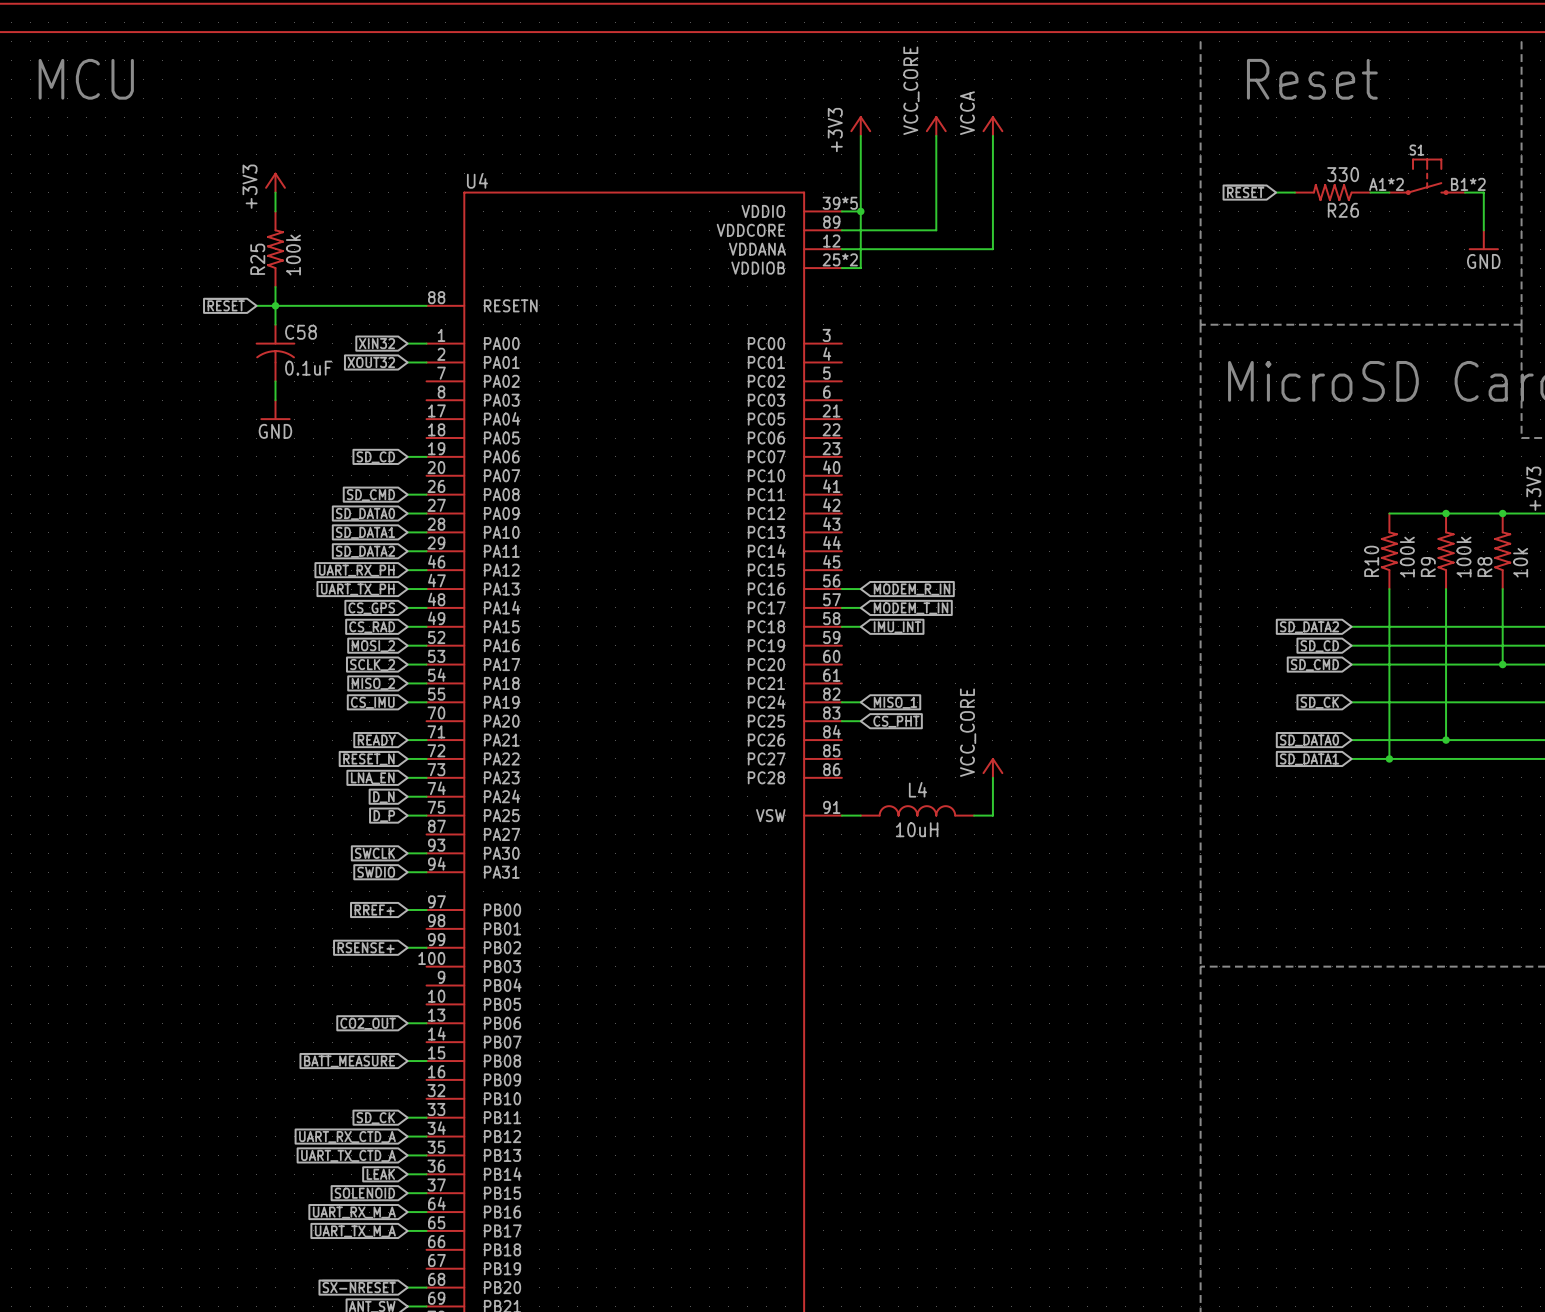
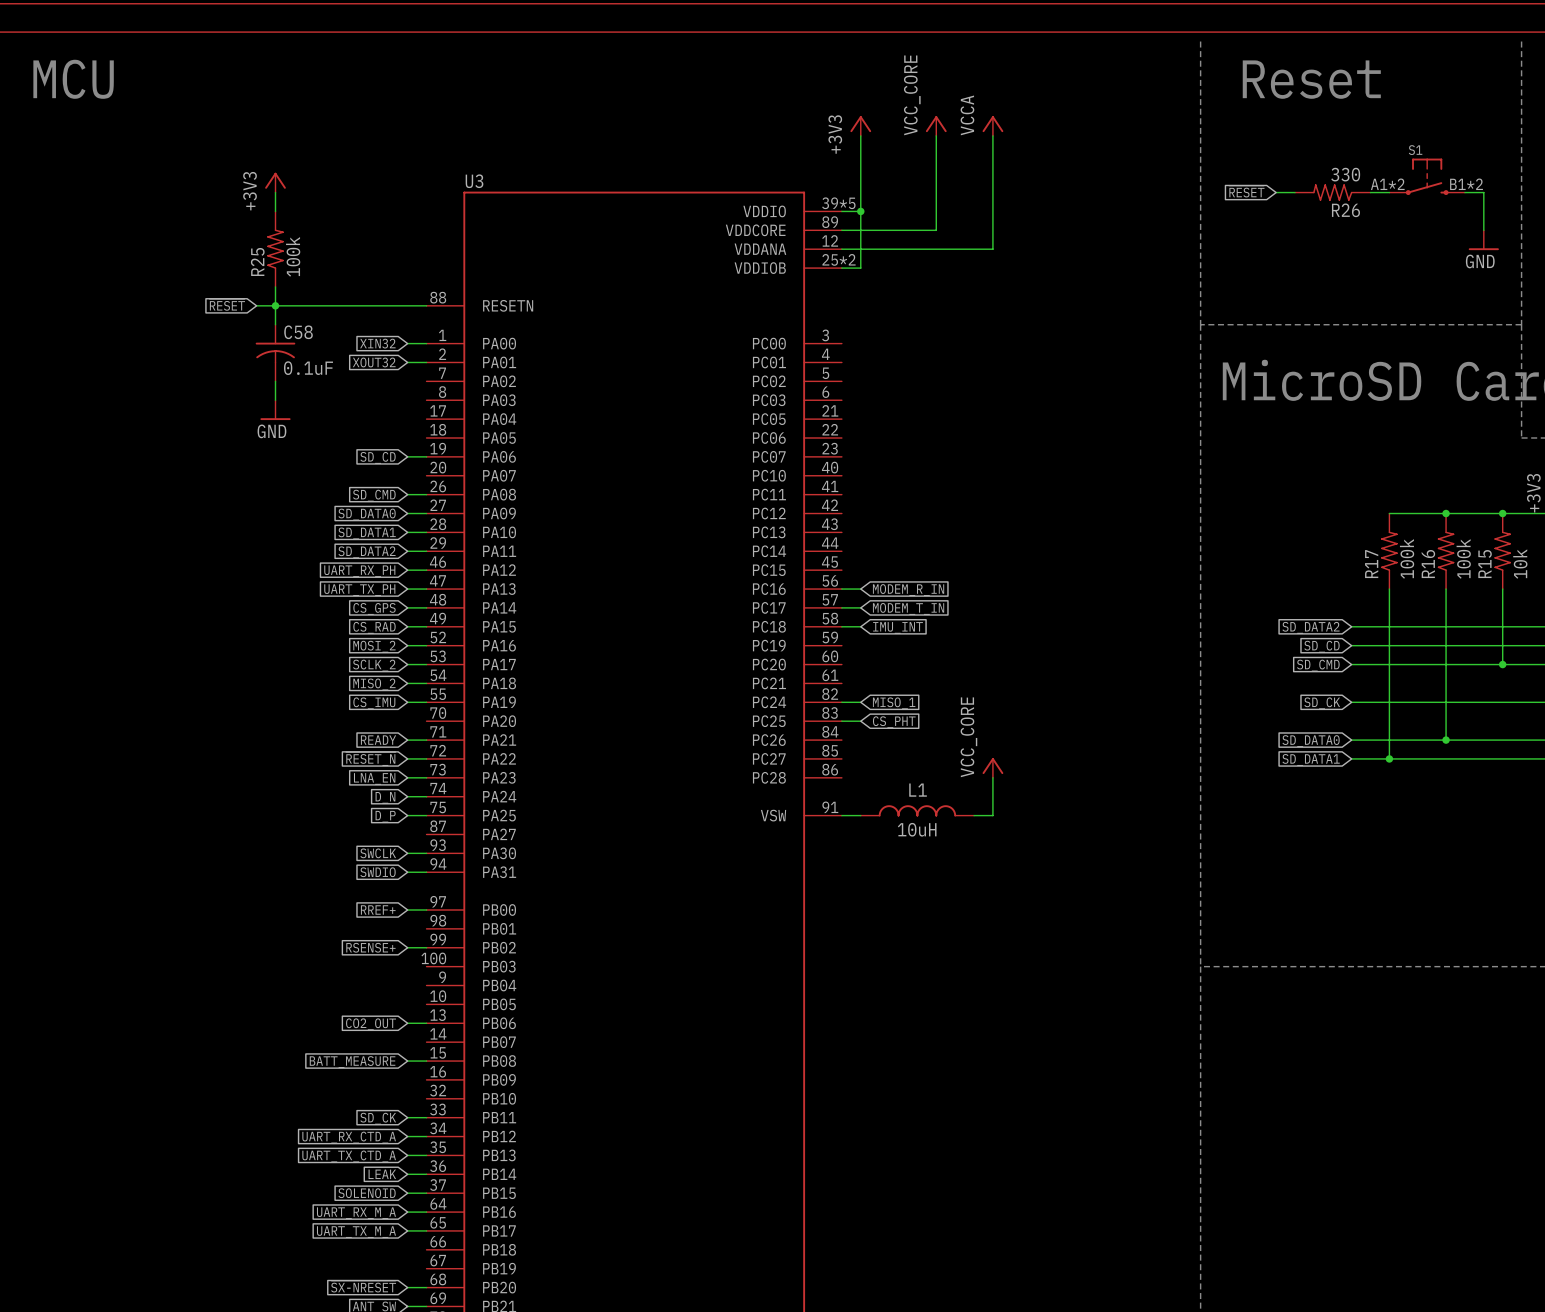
U4 name: U4 (477, 180) -> U3 (474, 181)
R10 name: R10 (1371, 561) -> R17 (1371, 564)
R9 name: R9 (1428, 567) -> R16 (1428, 564)
R8 name: R8 (1484, 567) -> R15 (1485, 564)
L4 name: L4 (917, 789) -> L1 (918, 790)

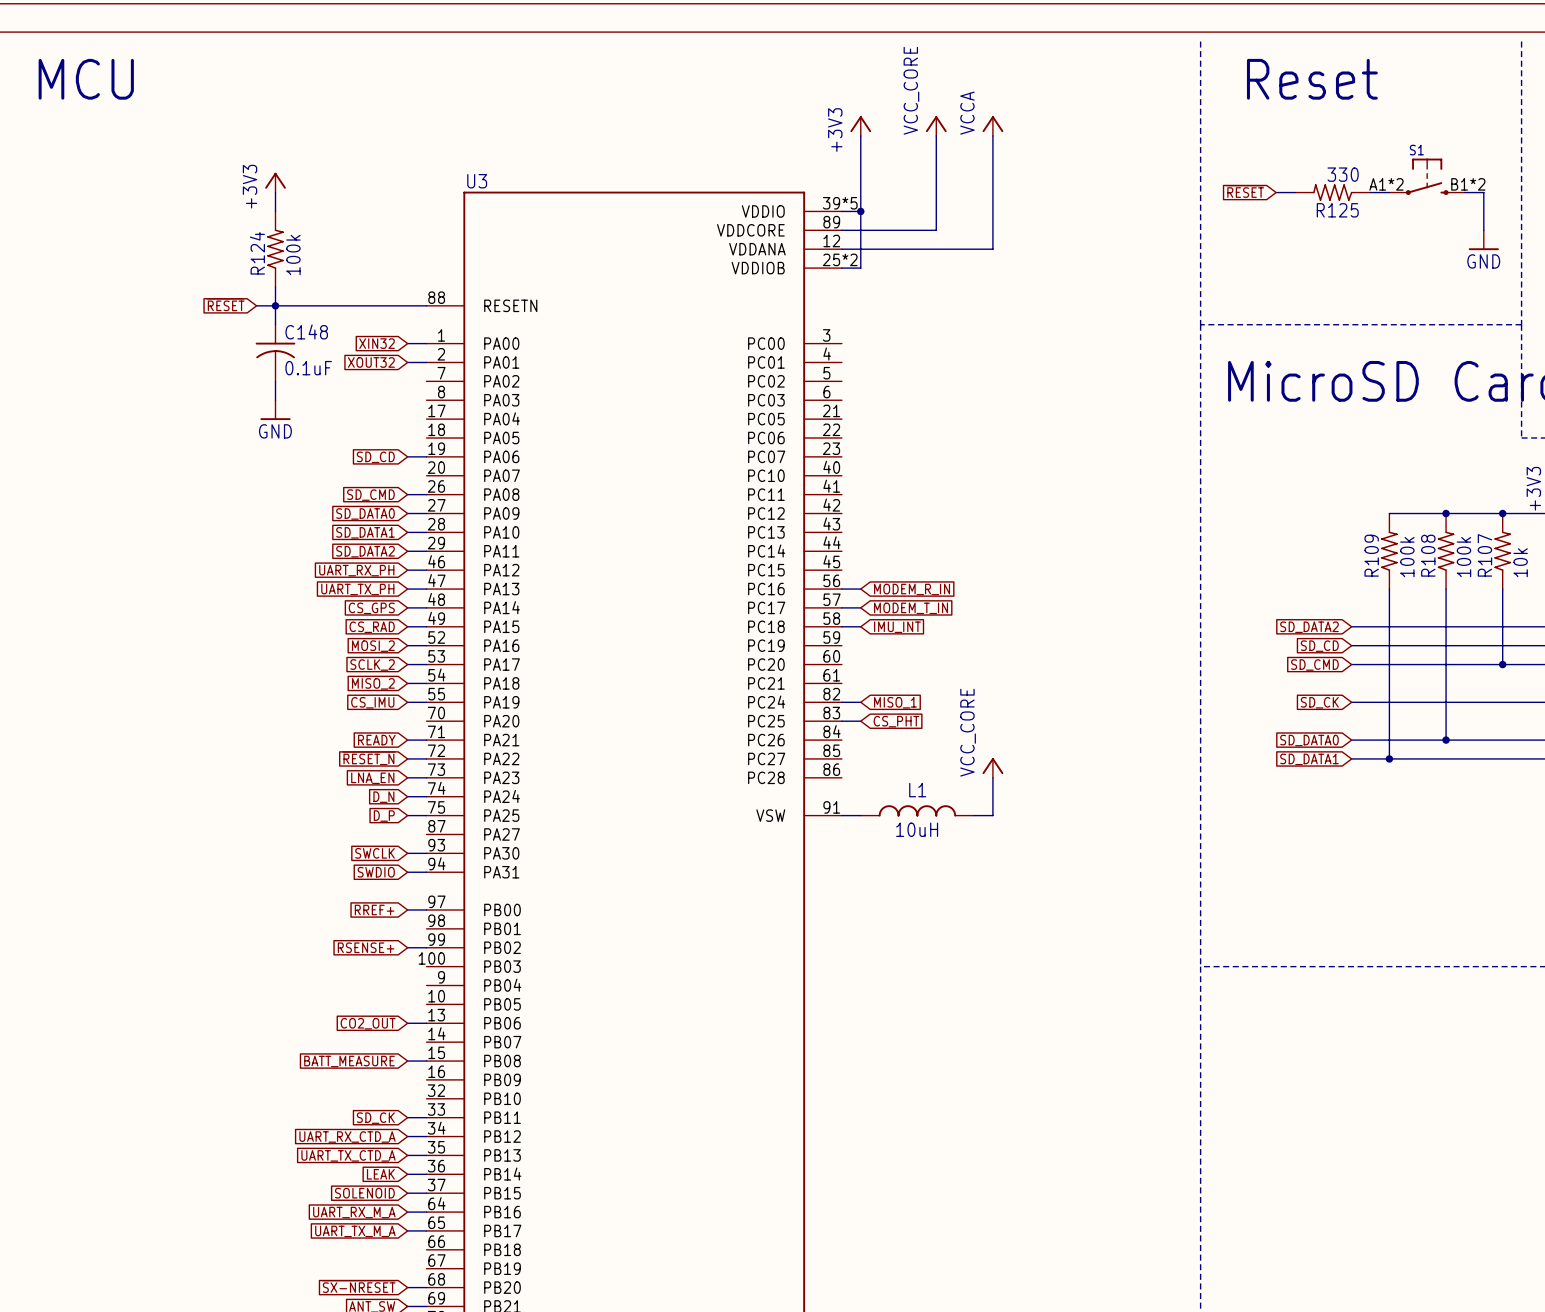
R26 name: R26 (1345, 210) -> R125 (1337, 210)
R25 name: R25 (257, 261) -> R124 (257, 253)
C58 name: C58 (298, 332) -> C148 (306, 331)
R17 name: R17 (1371, 564) -> R109 (1371, 555)
R16 name: R16 (1428, 564) -> R108 (1428, 555)
R15 name: R15 (1485, 564) -> R107 (1484, 555)

